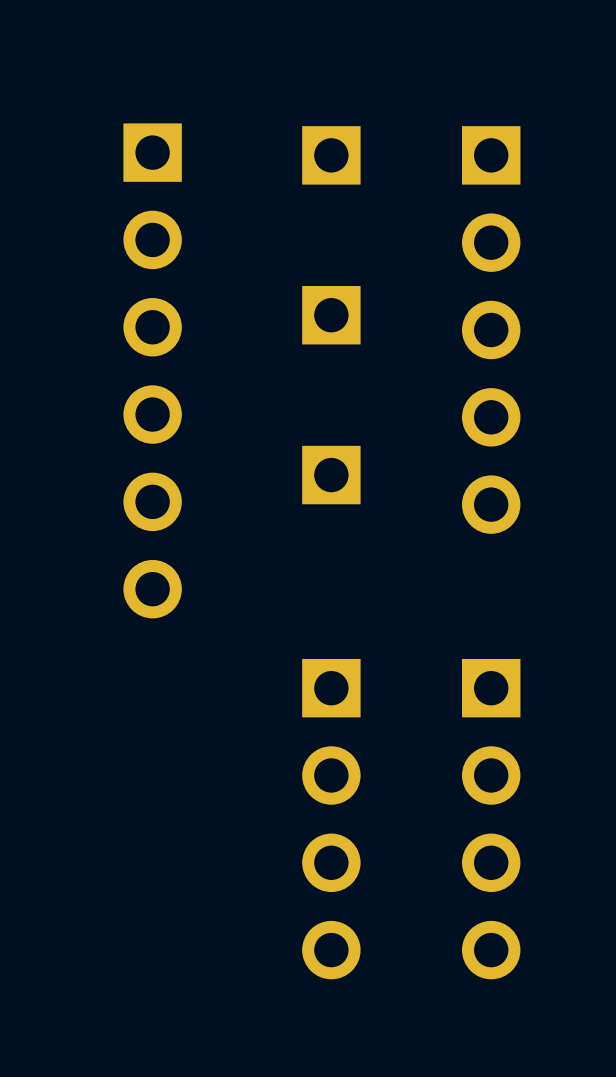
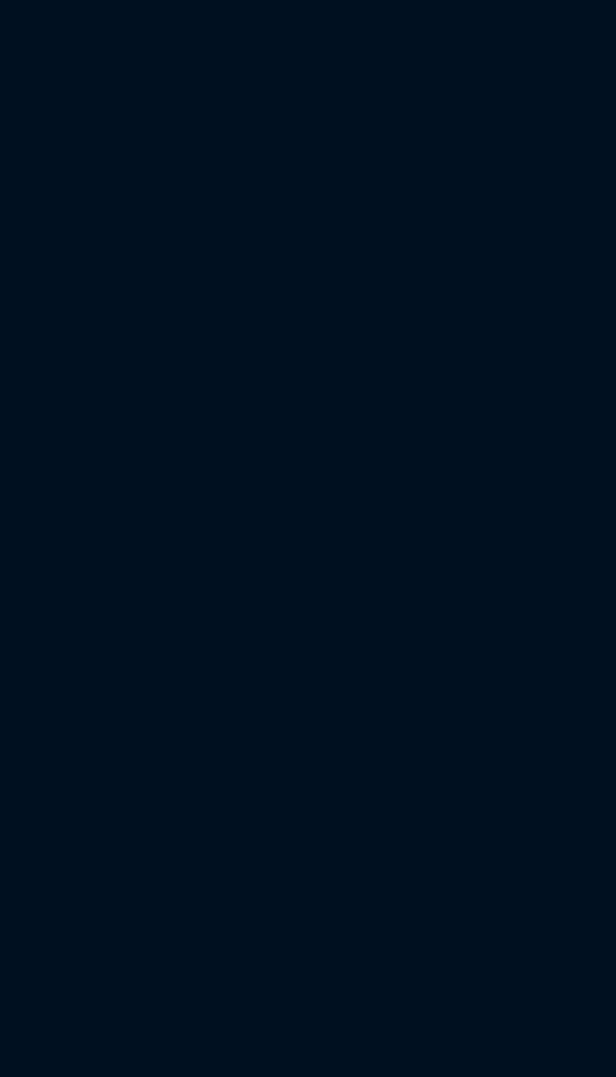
part: (331, 155) -> none
part: (331, 315) -> none
part: (491, 329) -> none
part: (152, 370) -> none
part: (331, 475) -> none
part: (331, 819) -> none
part: (491, 819) -> none

